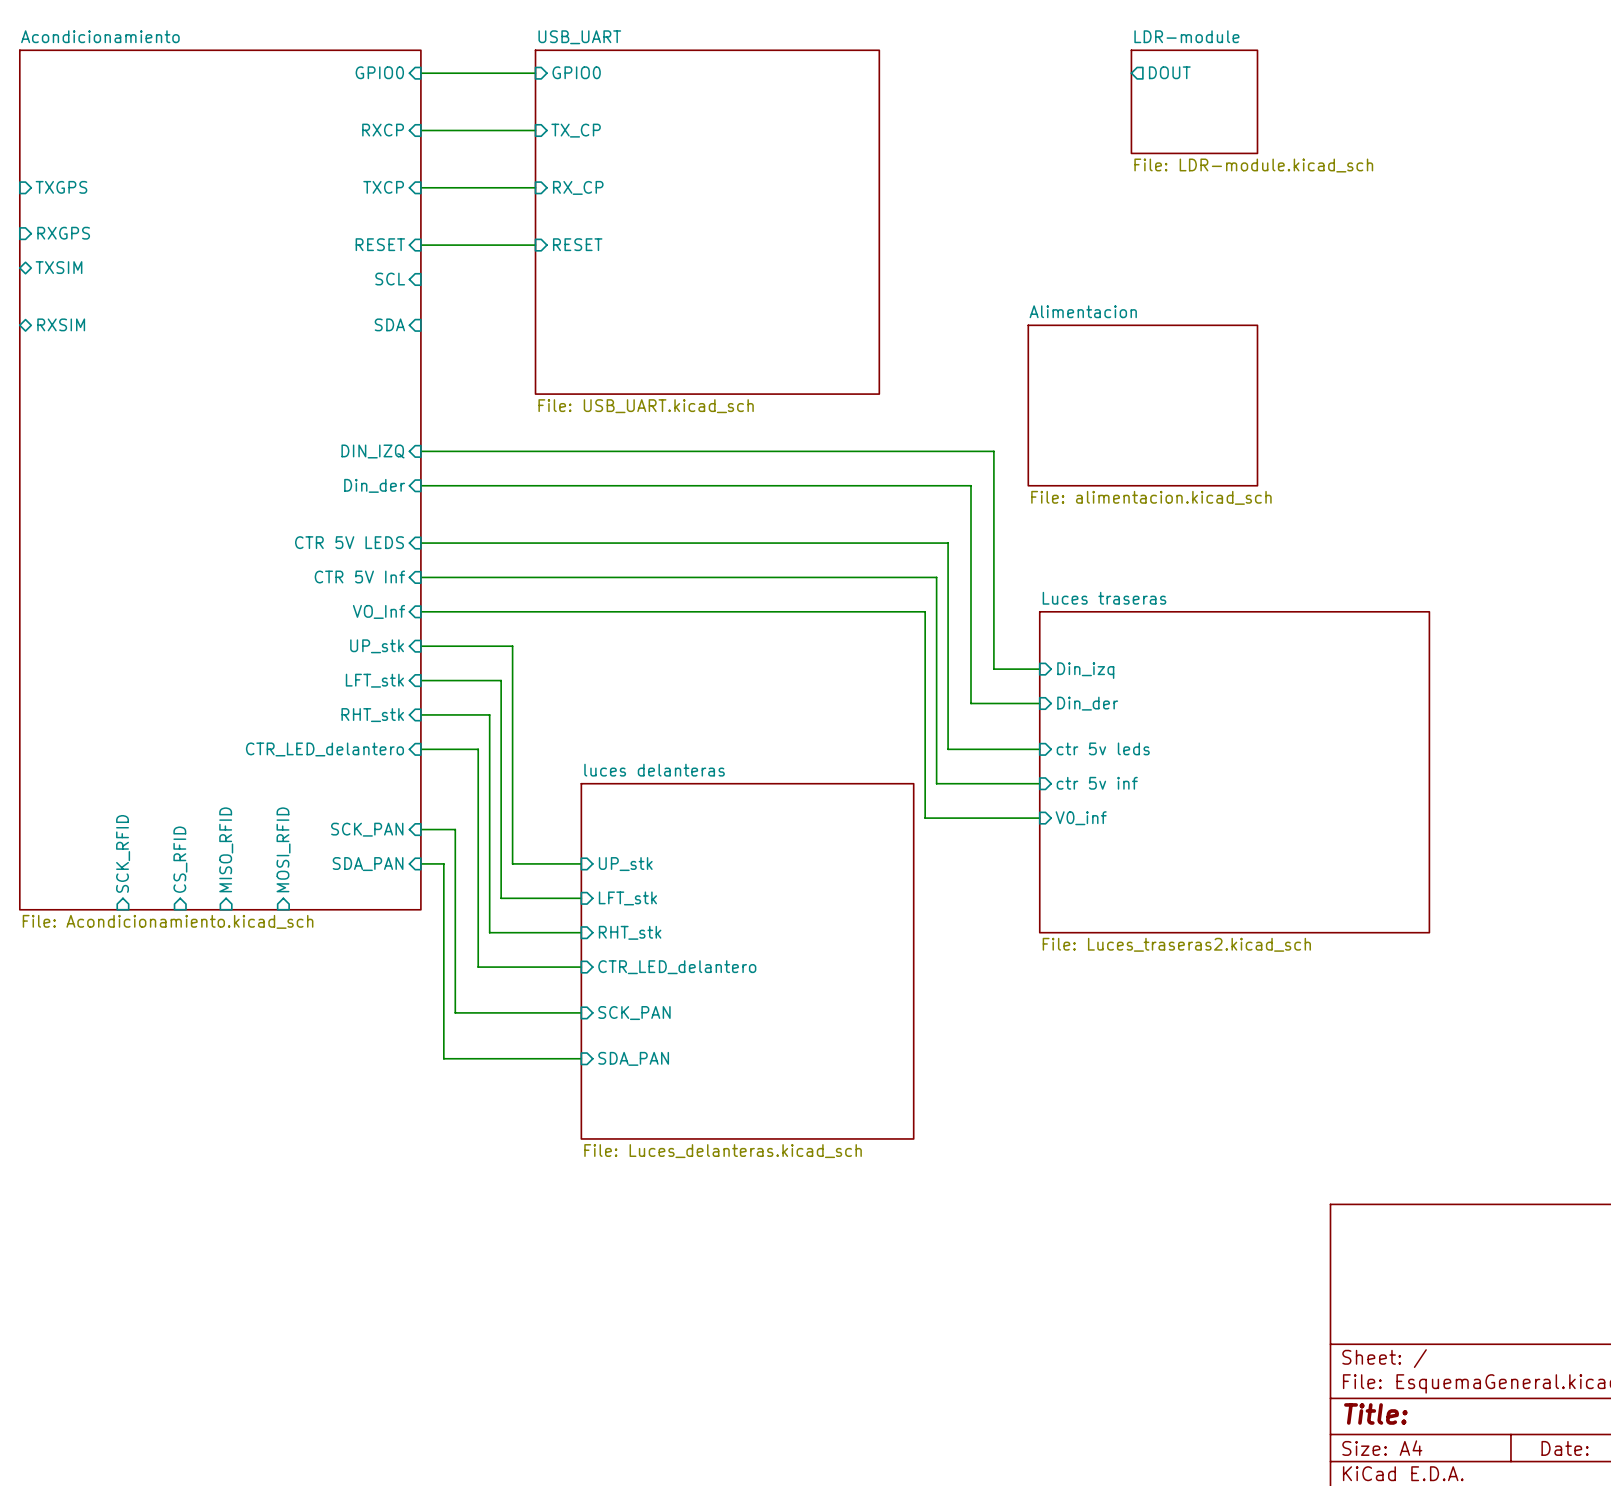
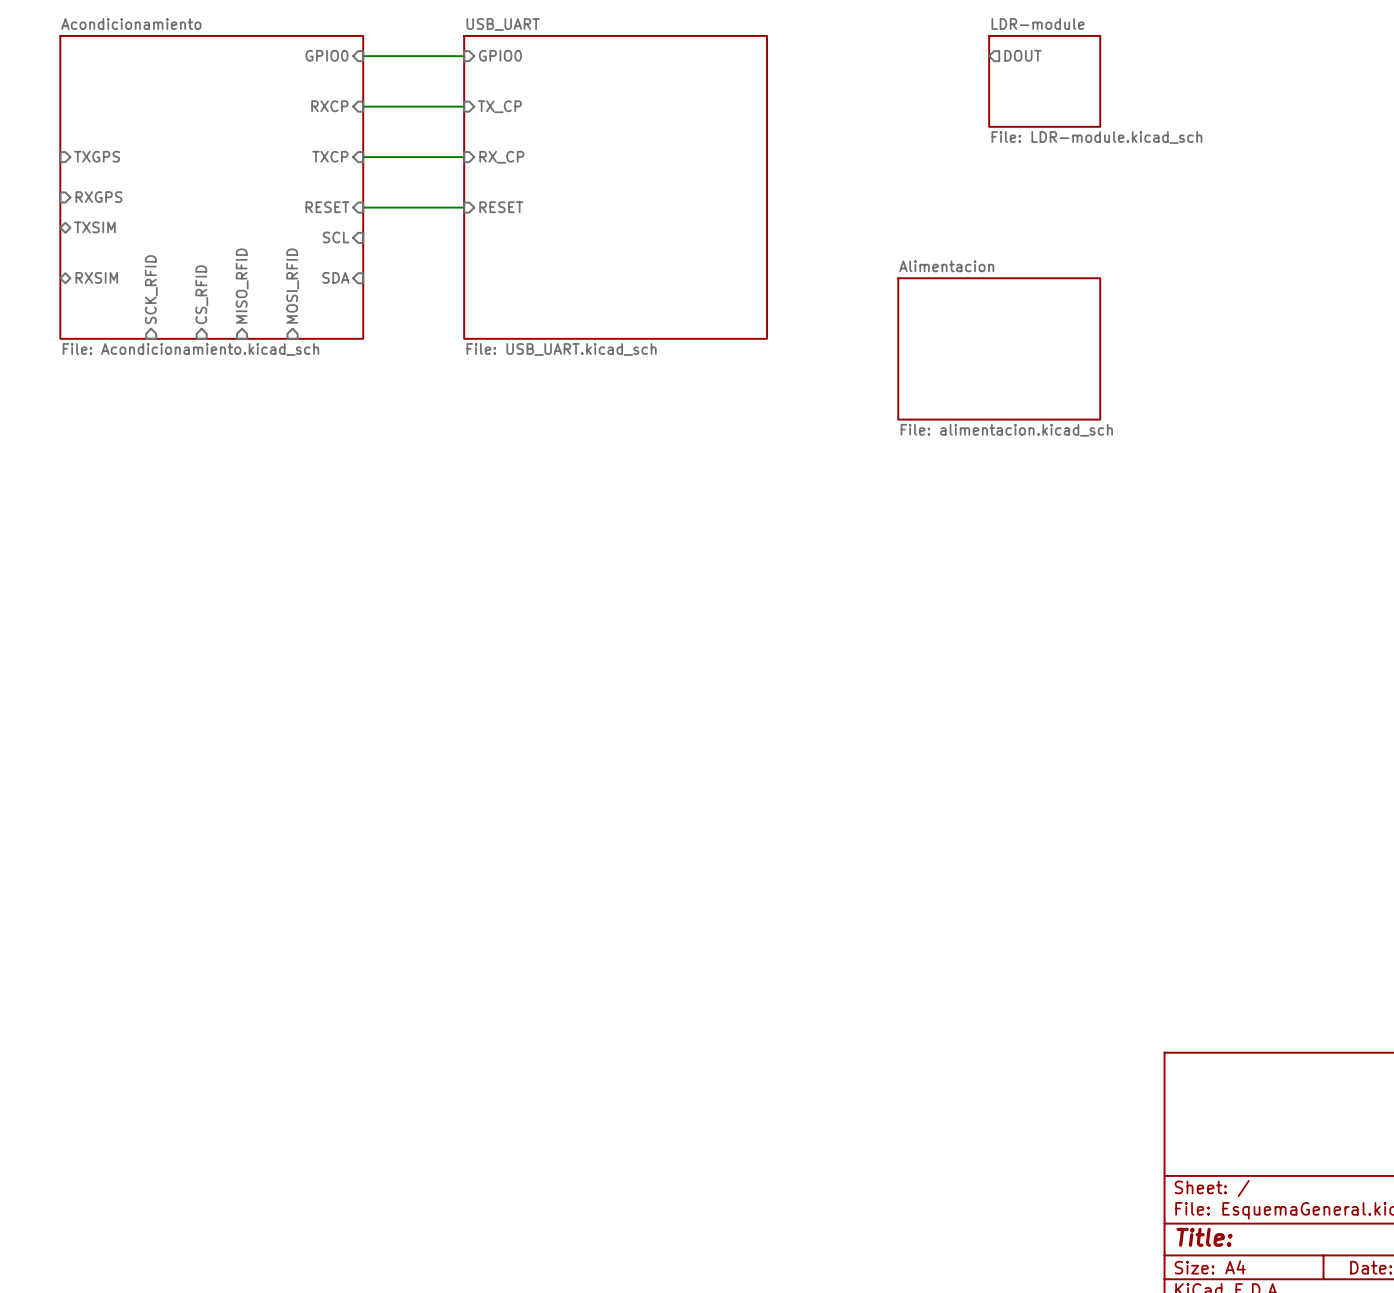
sheet pin position: TXGPS (61, 187) -> TXGPS (97, 156)
sheet Acondicionamiento: none -> File: Acondicionamiento.kicad_sch (211, 187)
sheet pin position: RXGPS (63, 233) -> RXGPS (98, 197)
sheet pin position: TXSIM (59, 267) -> TXSIM (94, 227)
sheet pin position: RXSIM (61, 324) -> RXSIM (96, 277)
sheet pin: none -> MISO_RFID (242, 286)
sheet pin: none -> MOSI_RFID (292, 286)
sheet pin: none -> SCK_RFID (151, 289)
sheet pin: none -> CS_RFID (201, 294)
sheet pin: DIN_IZQ (372, 451) -> none
wire: (420, 451) (993, 451) (993, 669) (1039, 669) -> none
sheet Acondicionamiento: File: Acondicionamiento.kicad_sch (220, 480) -> none
sheet pin: Din_der (374, 485) -> none
wire: (420, 485) (970, 485) (970, 703) (1039, 703) -> none
sheet pin: CTR 5V LEDS (349, 542) -> none
wire: (420, 543) (948, 543) (948, 749) (1039, 749) -> none
sheet pin: CTR 5V Inf (359, 577) -> none
wire: (420, 577) (936, 577) (936, 783) (1039, 783) -> none
sheet pin: VO_Inf (378, 611) -> none
wire: (420, 611) (925, 611) (925, 818) (1039, 818) -> none
sheet pin: UP_stk (377, 646) -> none
wire: (420, 646) (512, 646) (512, 863) (581, 863) -> none
sheet pin: Din_izq (1085, 670) -> none
sheet pin: LFT_stk (374, 680) -> none
wire: (420, 680) (501, 680) (501, 898) (581, 898) -> none
sheet pin: Din_der (1087, 703) -> none
wire: (420, 714) (489, 714) (489, 932) (581, 932) -> none
sheet pin: RHT_stk (372, 715) -> none
sheet pin: ctr 5v leds (1103, 748) -> none
sheet pin: CTR_LED_delantero (324, 749) -> none
wire: (420, 749) (478, 749) (478, 967) (581, 967) -> none
sheet Luces traseras: File: Luces_traseras2.kicad_sch (1234, 772) -> none
sheet pin: ctr 5v inf (1097, 783) -> none
sheet pin: V0_inf (1081, 818) -> none
sheet pin: SCK_PAN (367, 829) -> none
wire: (420, 829) (455, 829) (455, 1012) (581, 1012) -> none
sheet pin: MISO_RFID (226, 849) -> none
sheet pin: MOSI_RFID (283, 849) -> none
sheet pin: SCK_RFID (123, 853) -> none
sheet pin: CS_RFID (180, 859) -> none
wire: (420, 863) (443, 863) (443, 1058) (581, 1058) -> none
sheet pin: SDA_PAN (368, 864) -> none
sheet pin: UP_stk (625, 864) -> none
sheet pin: LFT_stk (627, 898) -> none
sheet pin: RHT_stk (630, 932) -> none
sheet luces delanteras: File: Luces_delanteras.kicad_sch (747, 961) -> none
sheet pin: CTR_LED_delantero (677, 967) -> none
sheet pin: SCK_PAN (634, 1013) -> none
sheet pin: SDA_PAN (633, 1058) -> none

